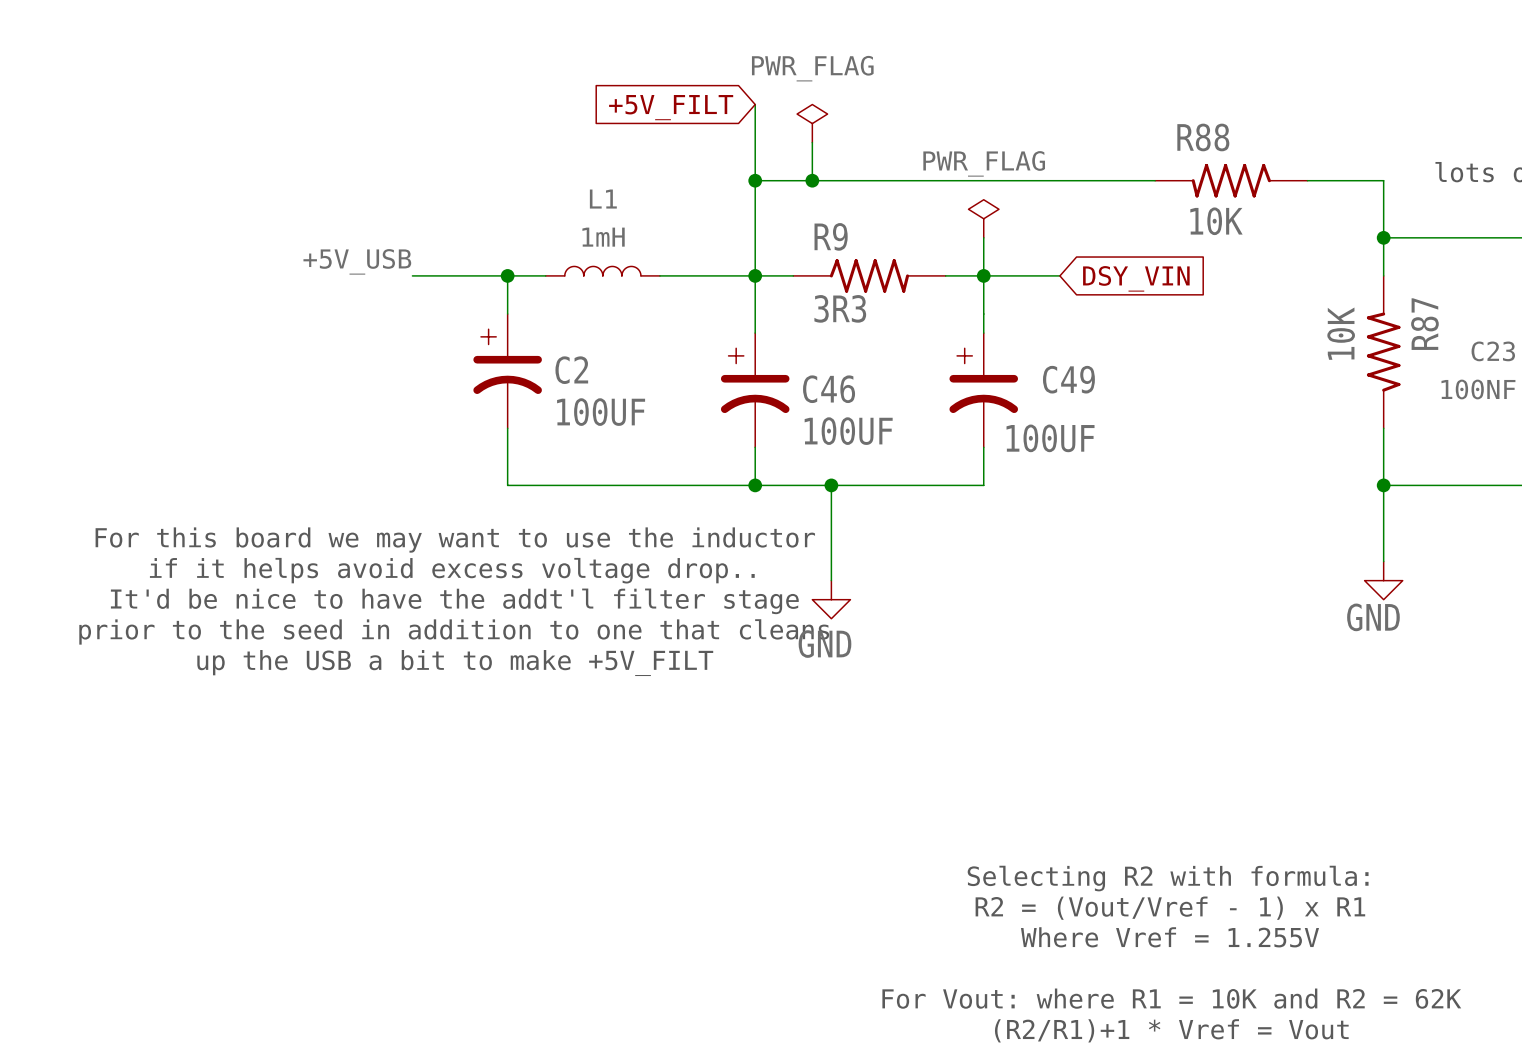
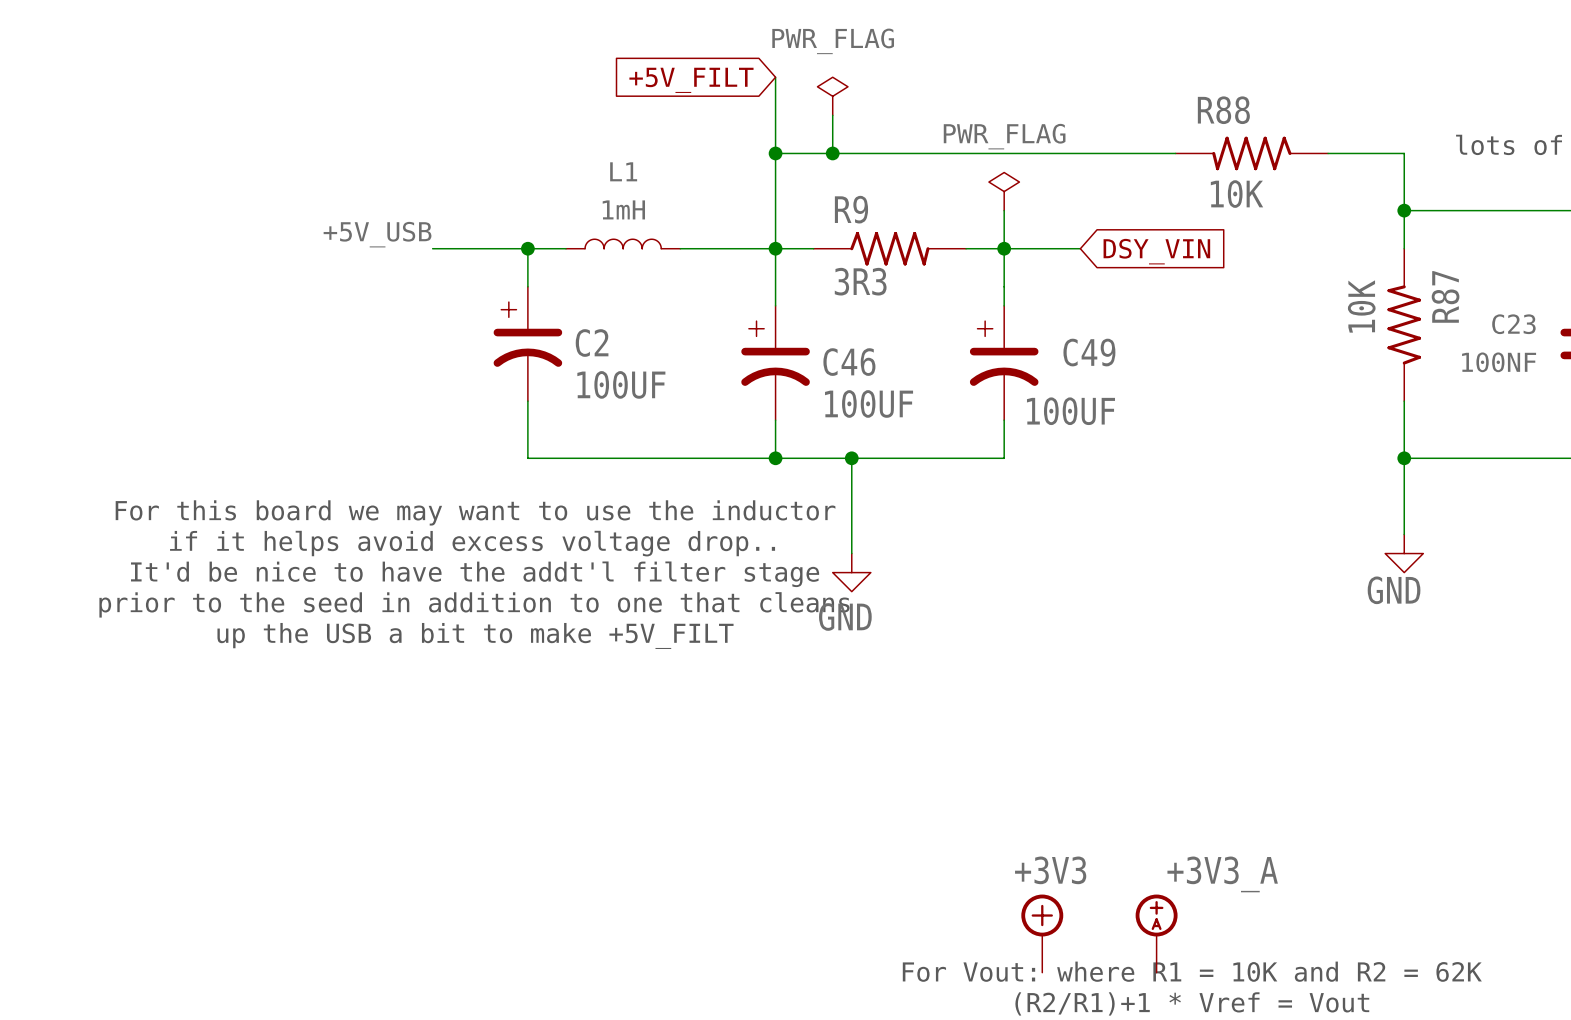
text: Selecting R2 with formula: (1168, 878) -> none
text: R2 = (Vout/Vref - 1) x R1 (1170, 908) -> none
text: Where Vref = 1.255V (1170, 937) -> none
power symbol: none -> +3V3 (1042, 933)
power symbol: none -> +3V3_A (1156, 933)

